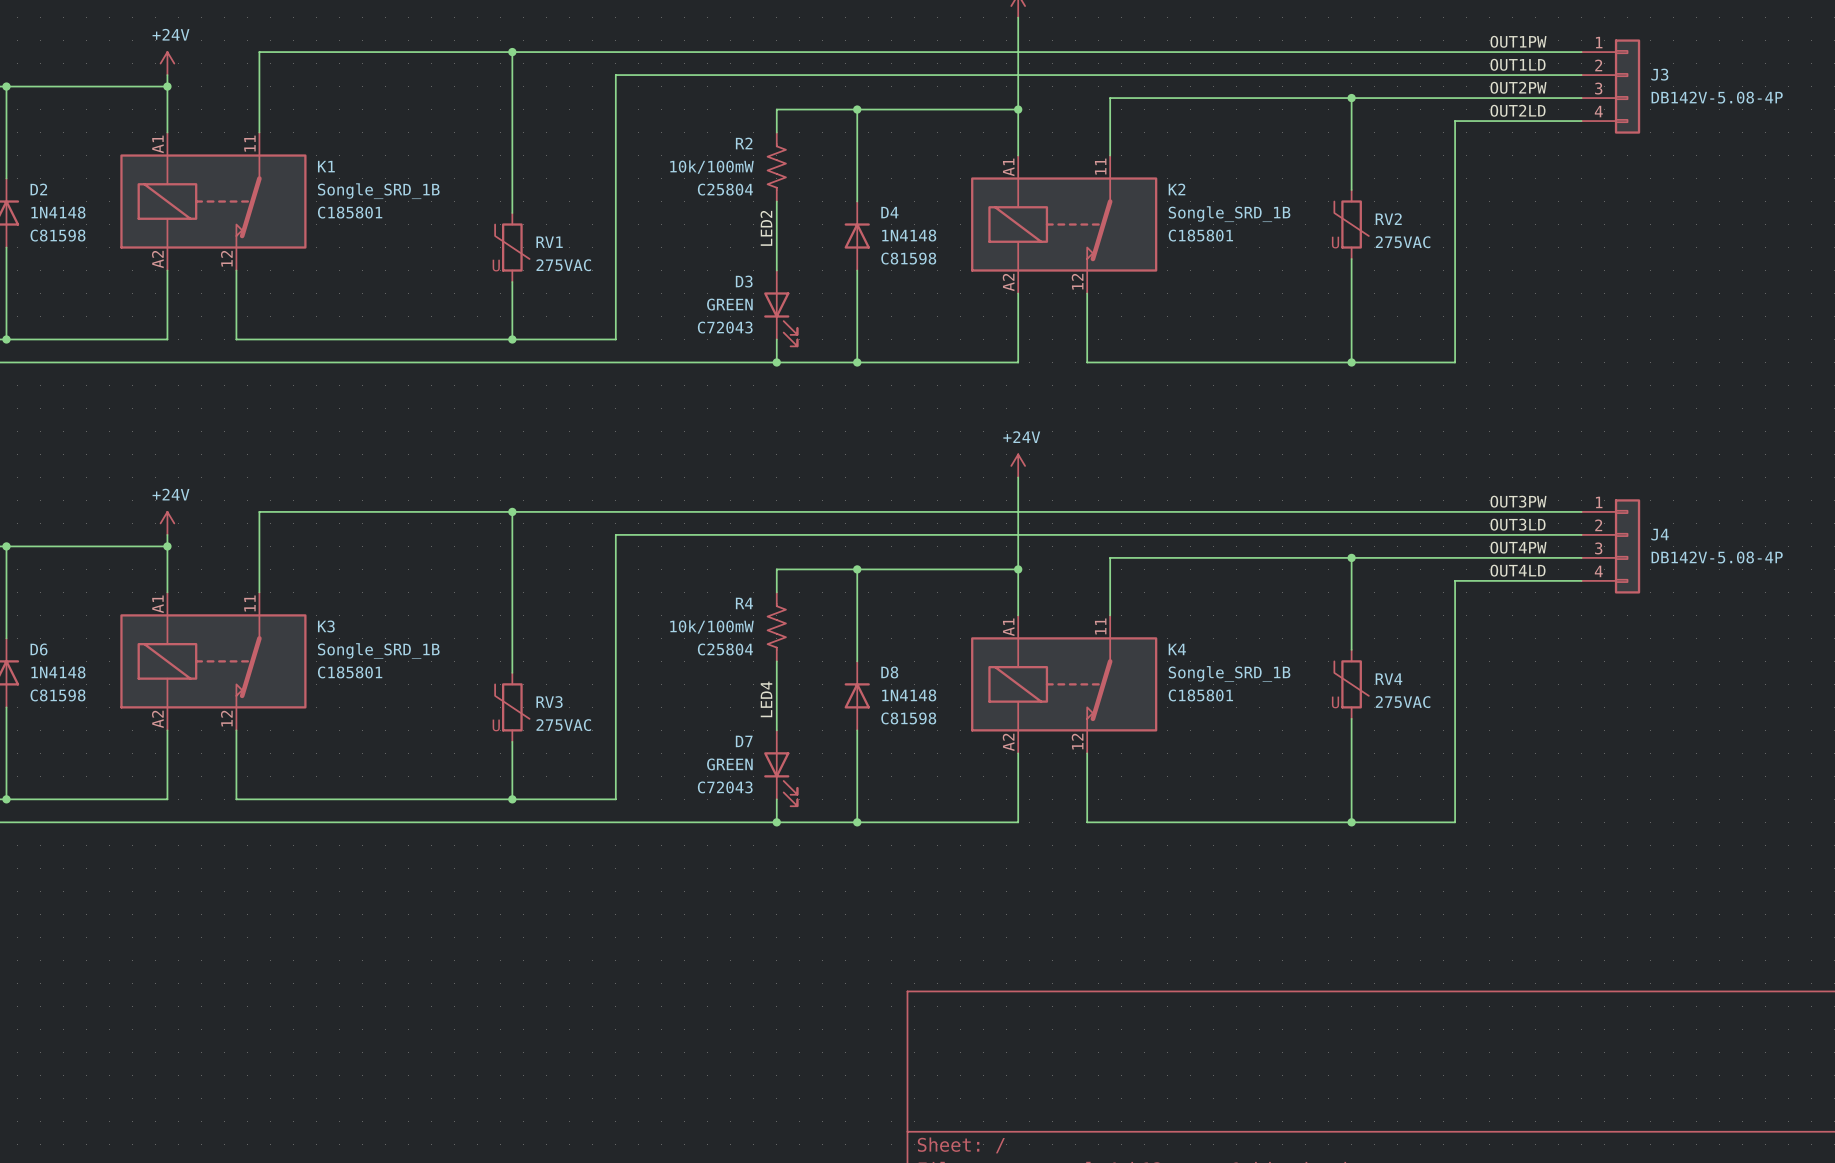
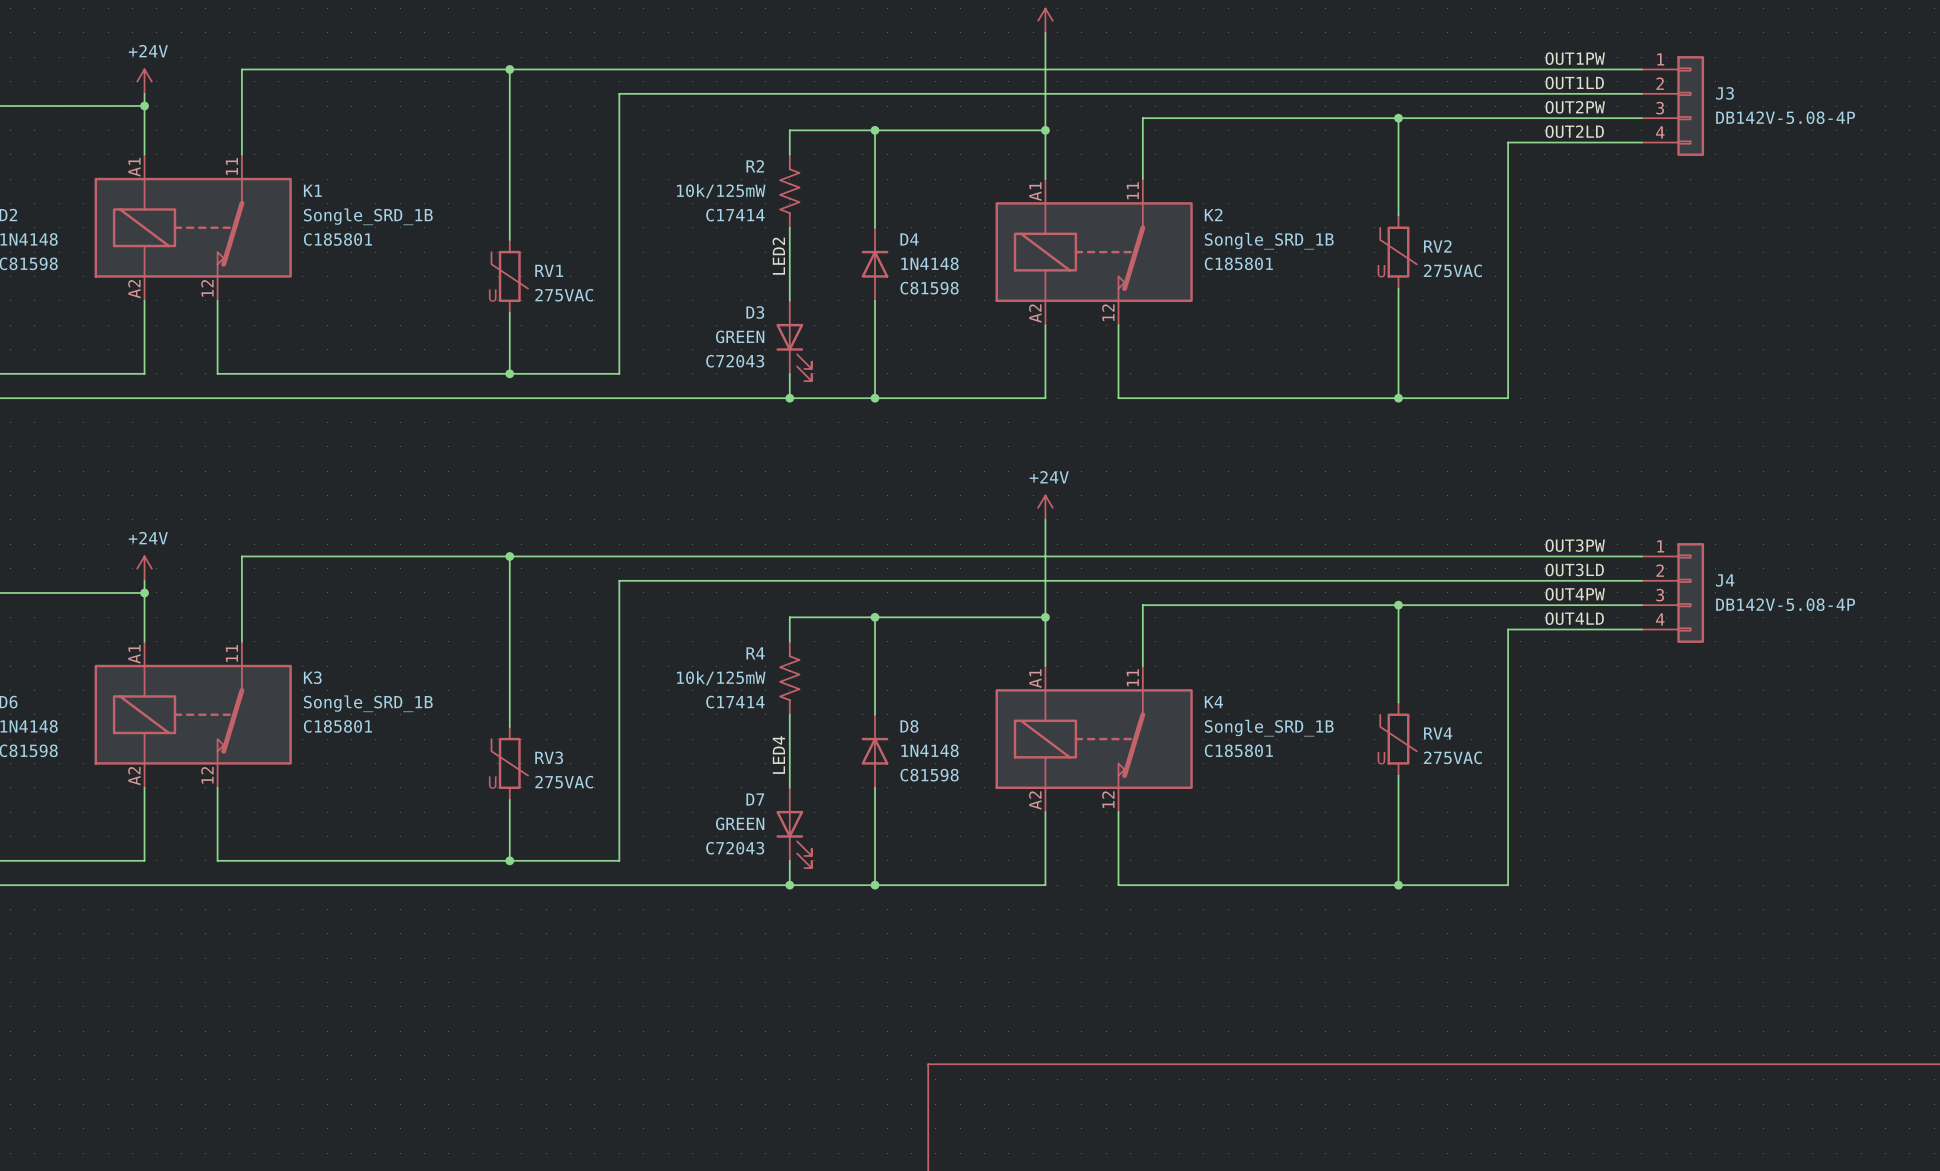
R2 value: 10k/100mW (712, 167) -> 10k/125mW (721, 191)
R2 text: C25804 (725, 189) -> C17414 (735, 215)
R4 value: 10k/100mW (712, 626) -> 10k/125mW (721, 678)
R4 text: C25804 (725, 649) -> C17414 (735, 702)

